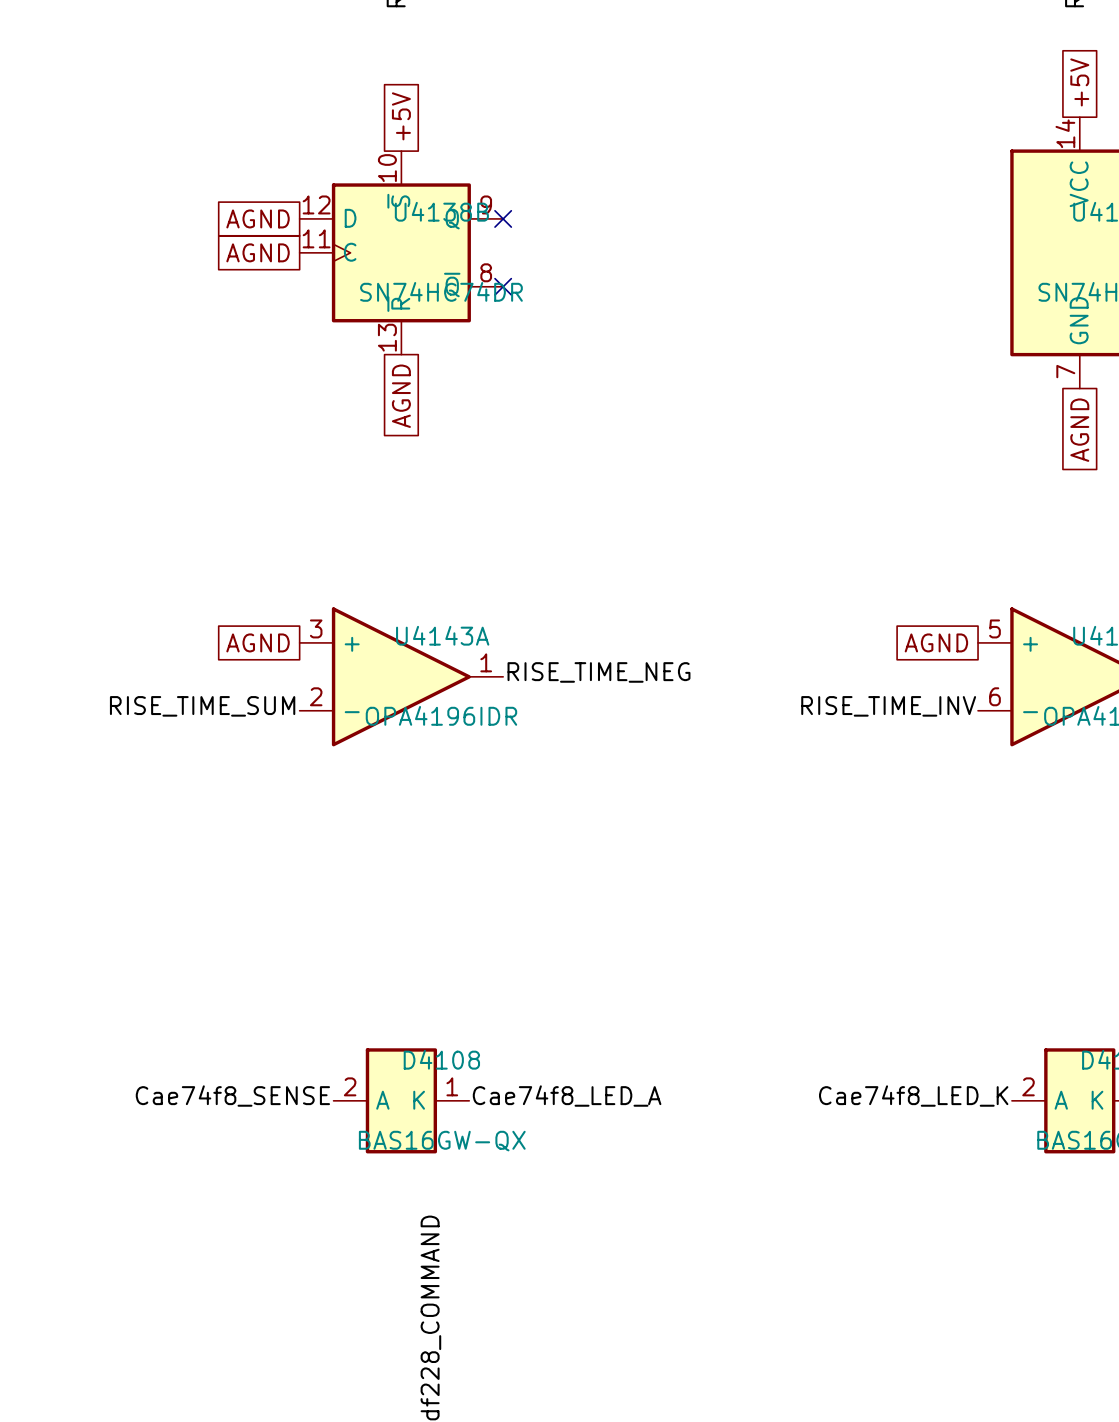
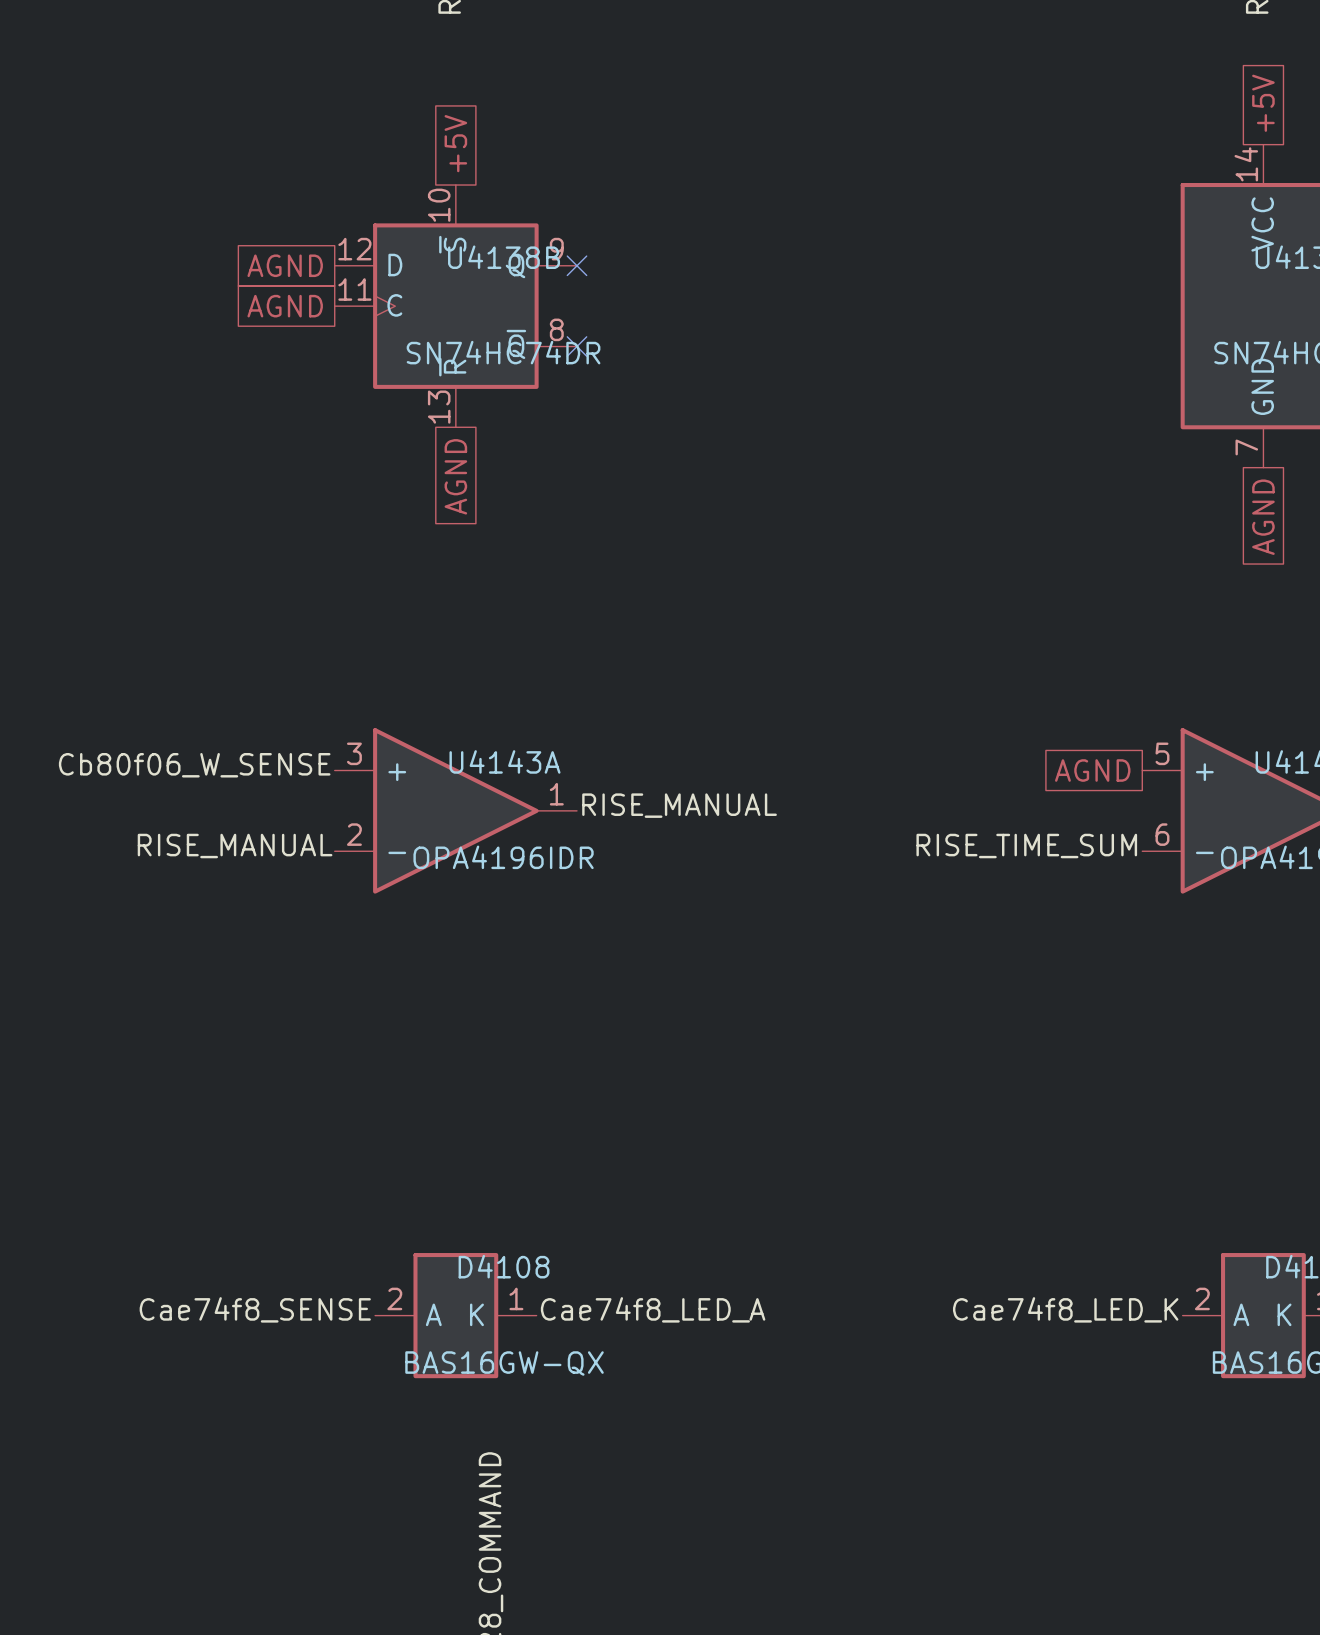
label: none -> Cb80f06_W_SENSE (194, 765)
global label: AGND (258, 642) -> none
label: RISE_TIME_NEG (598, 672) -> RISE_MANUAL (679, 805)
label: RISE_TIME_SUM (202, 706) -> RISE_MANUAL (235, 846)
label: RISE_TIME_INV (888, 706) -> RISE_TIME_SUM (1026, 846)

